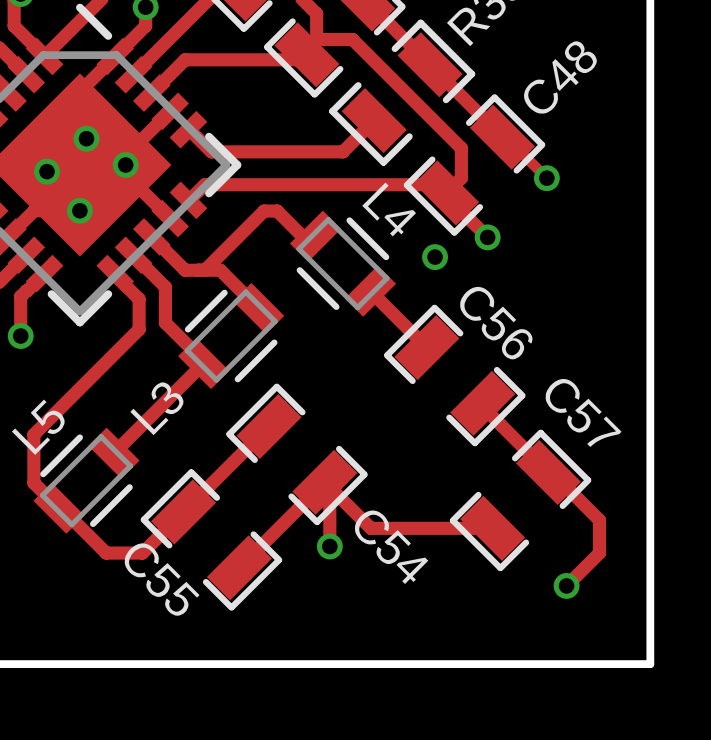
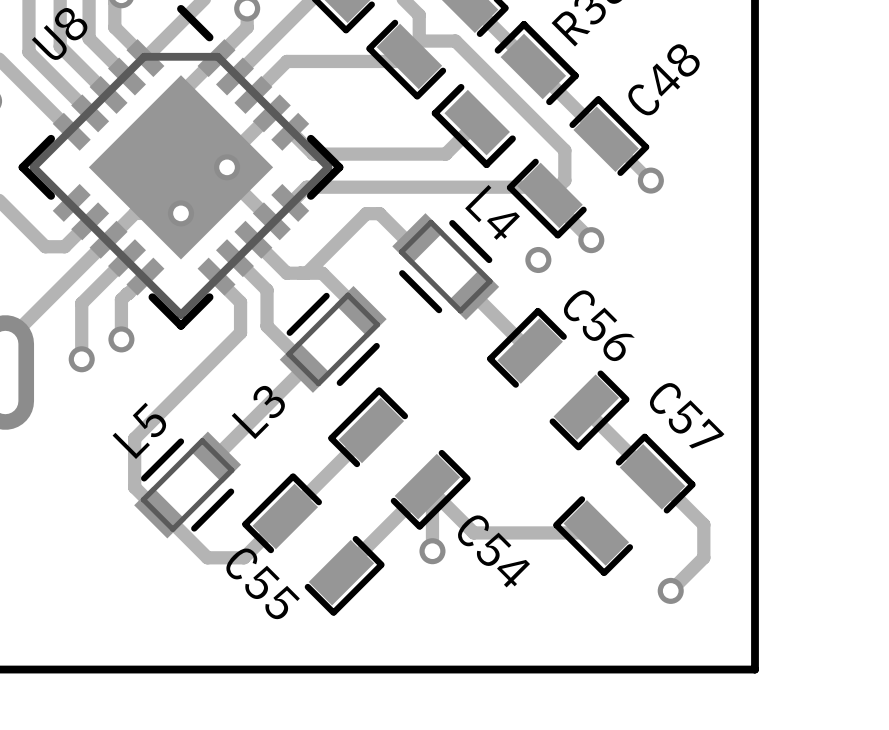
via: (86, 138) -> none
via: (47, 171) -> none

